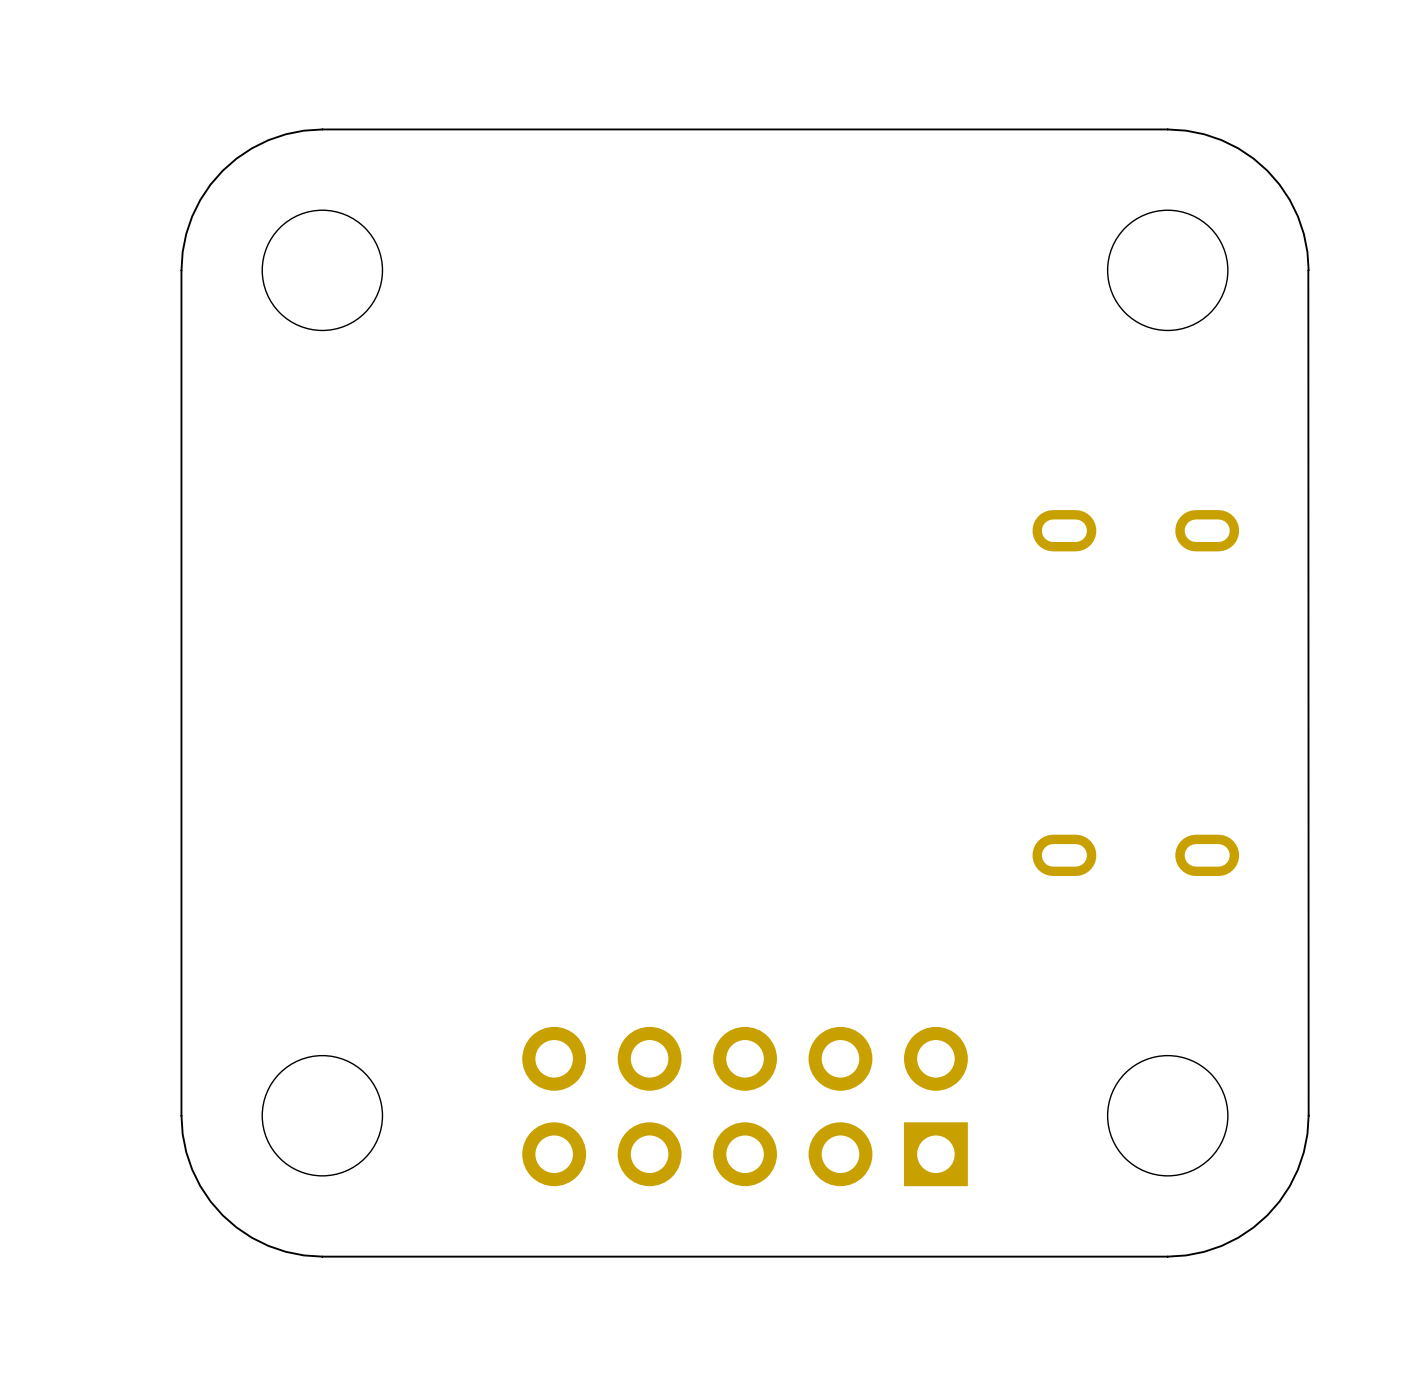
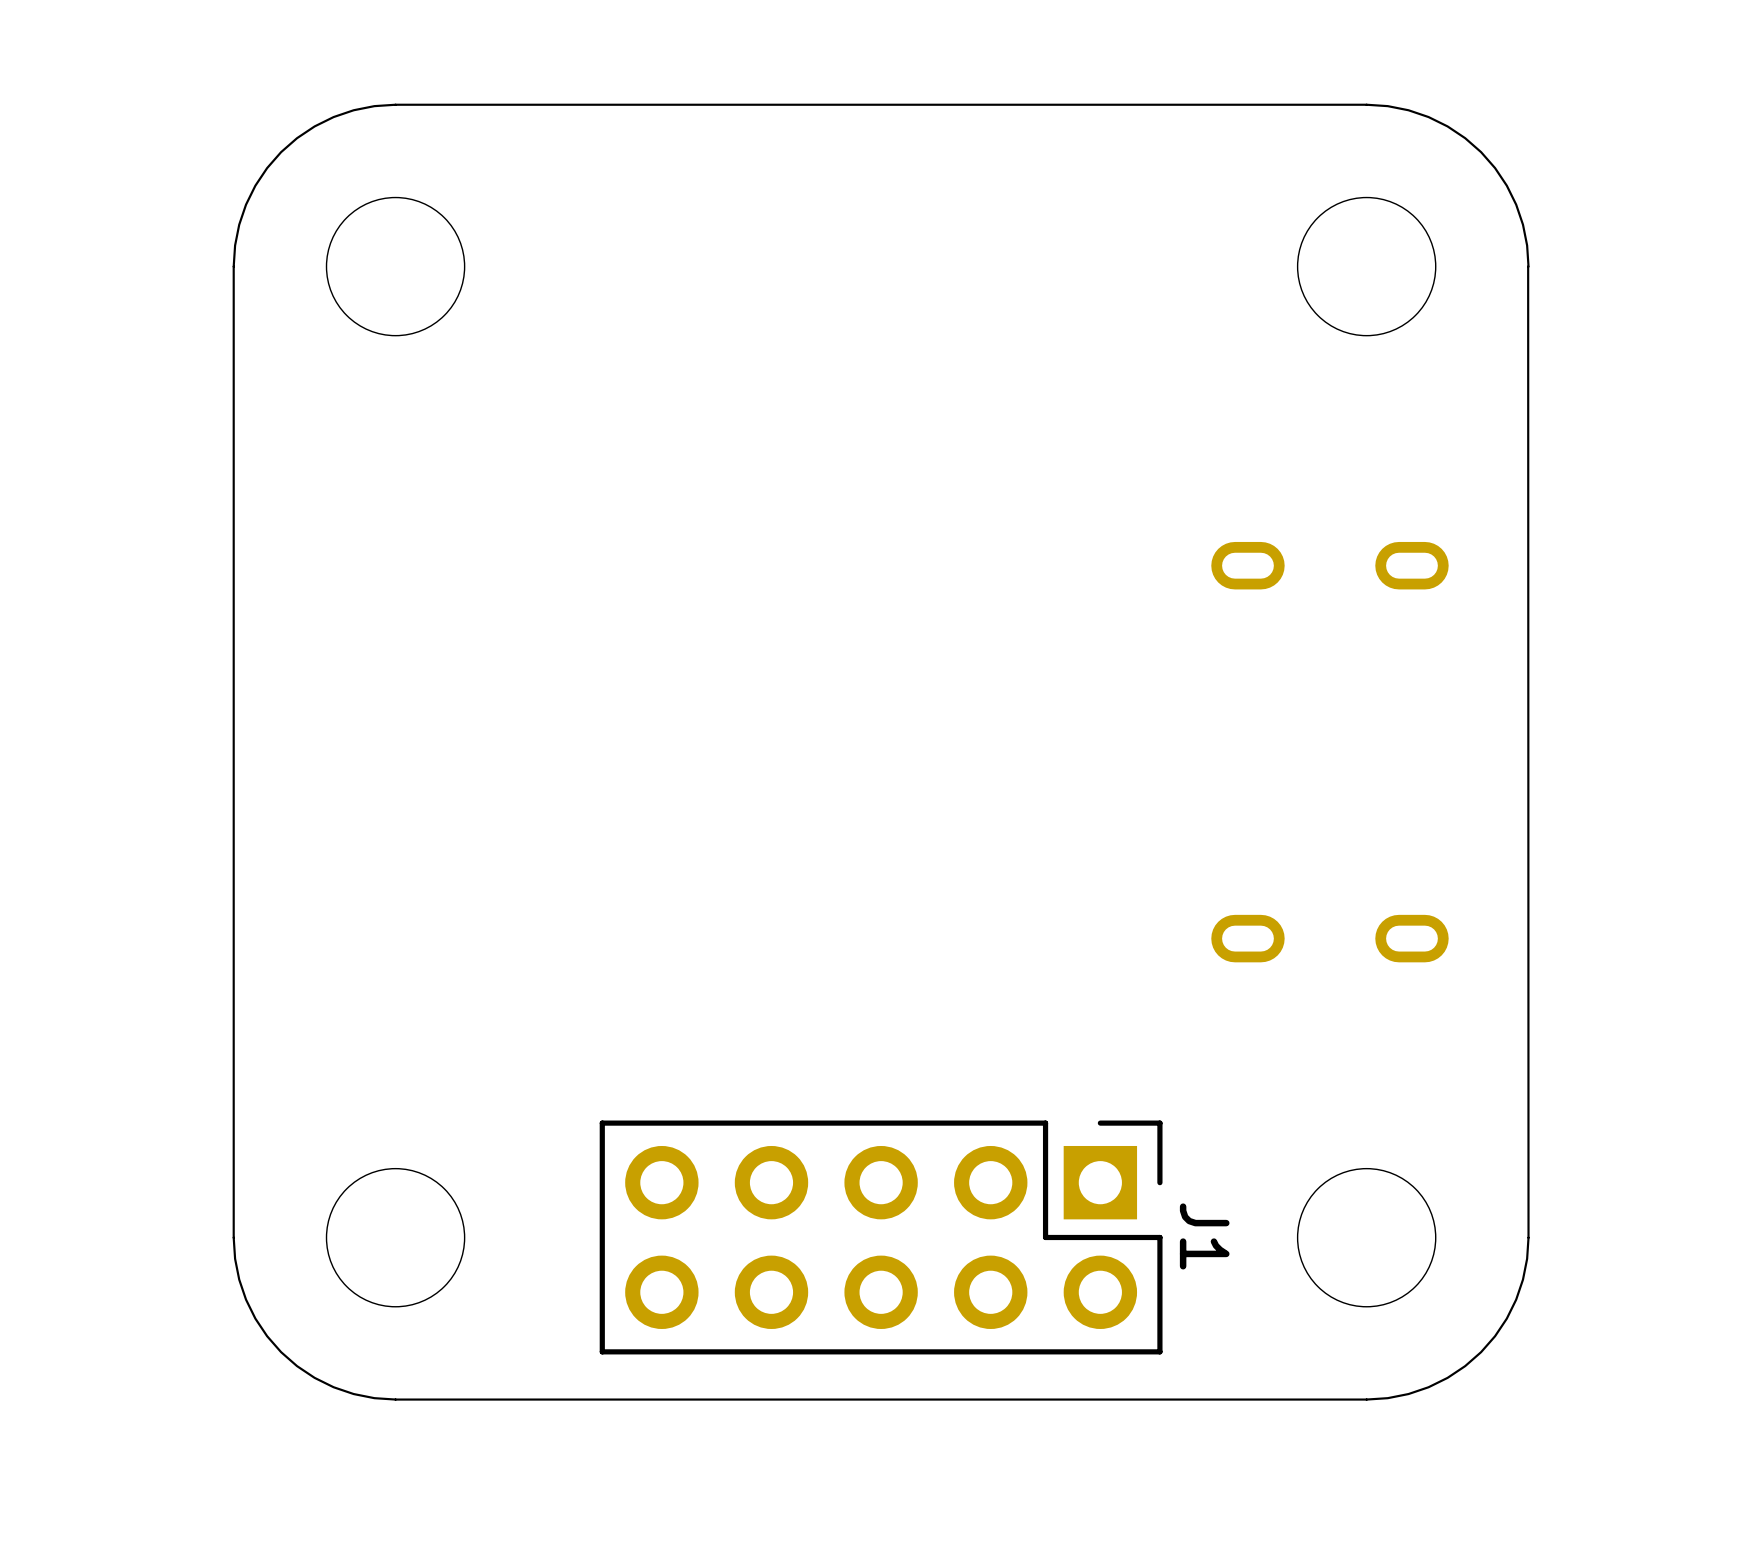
J1 side: top (745, 1106) -> bottom (881, 1237)

